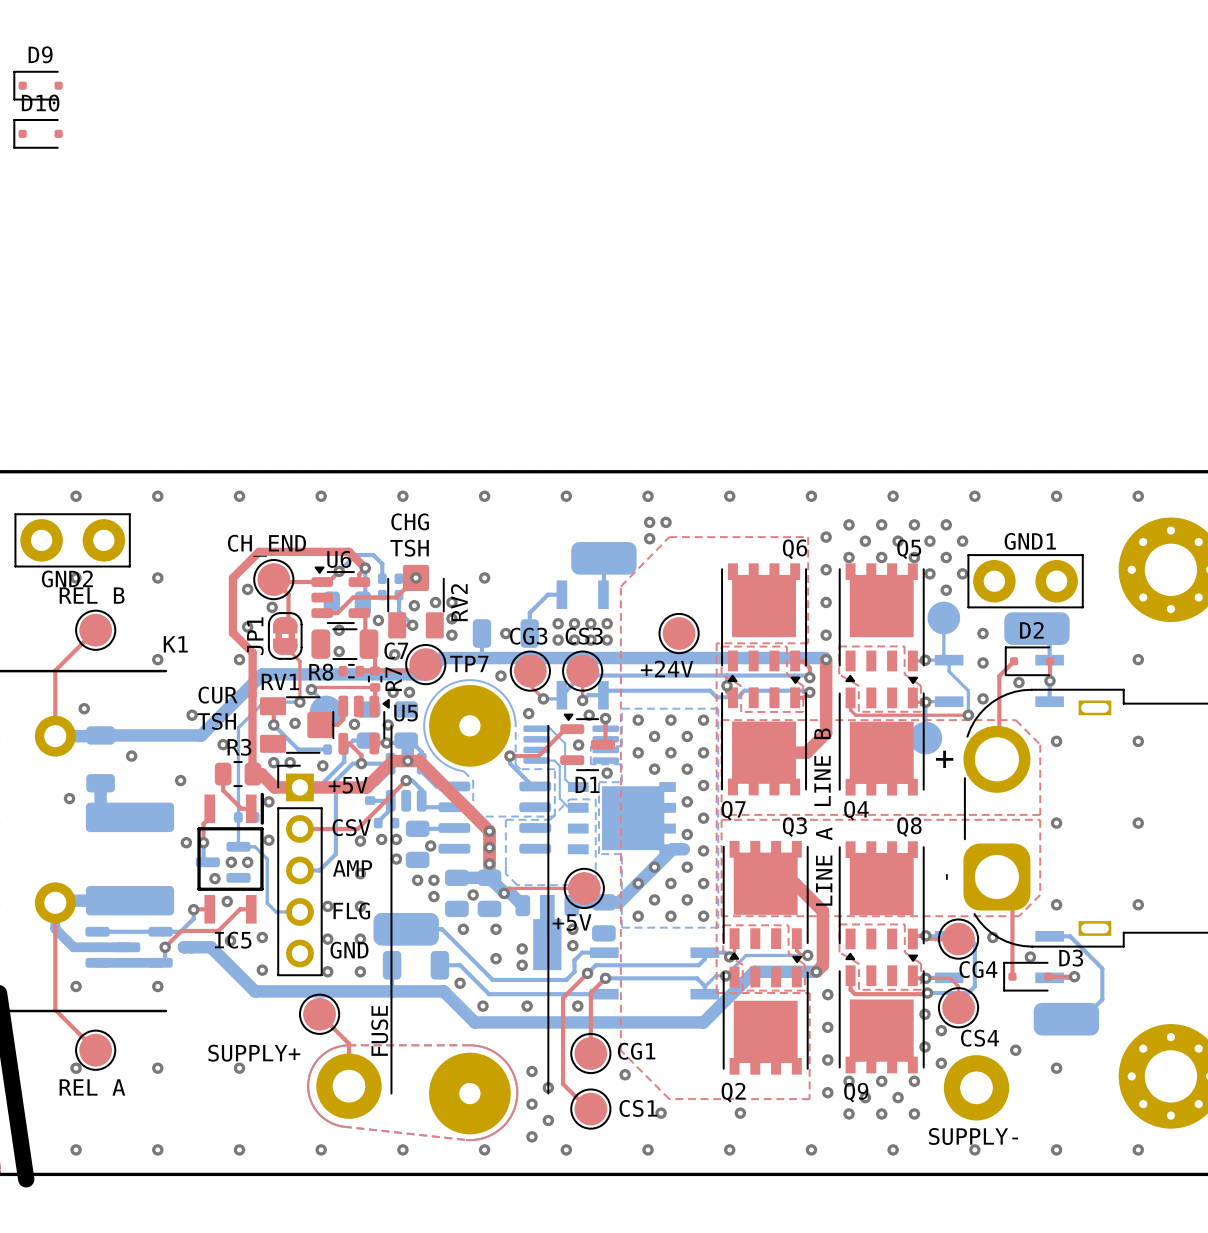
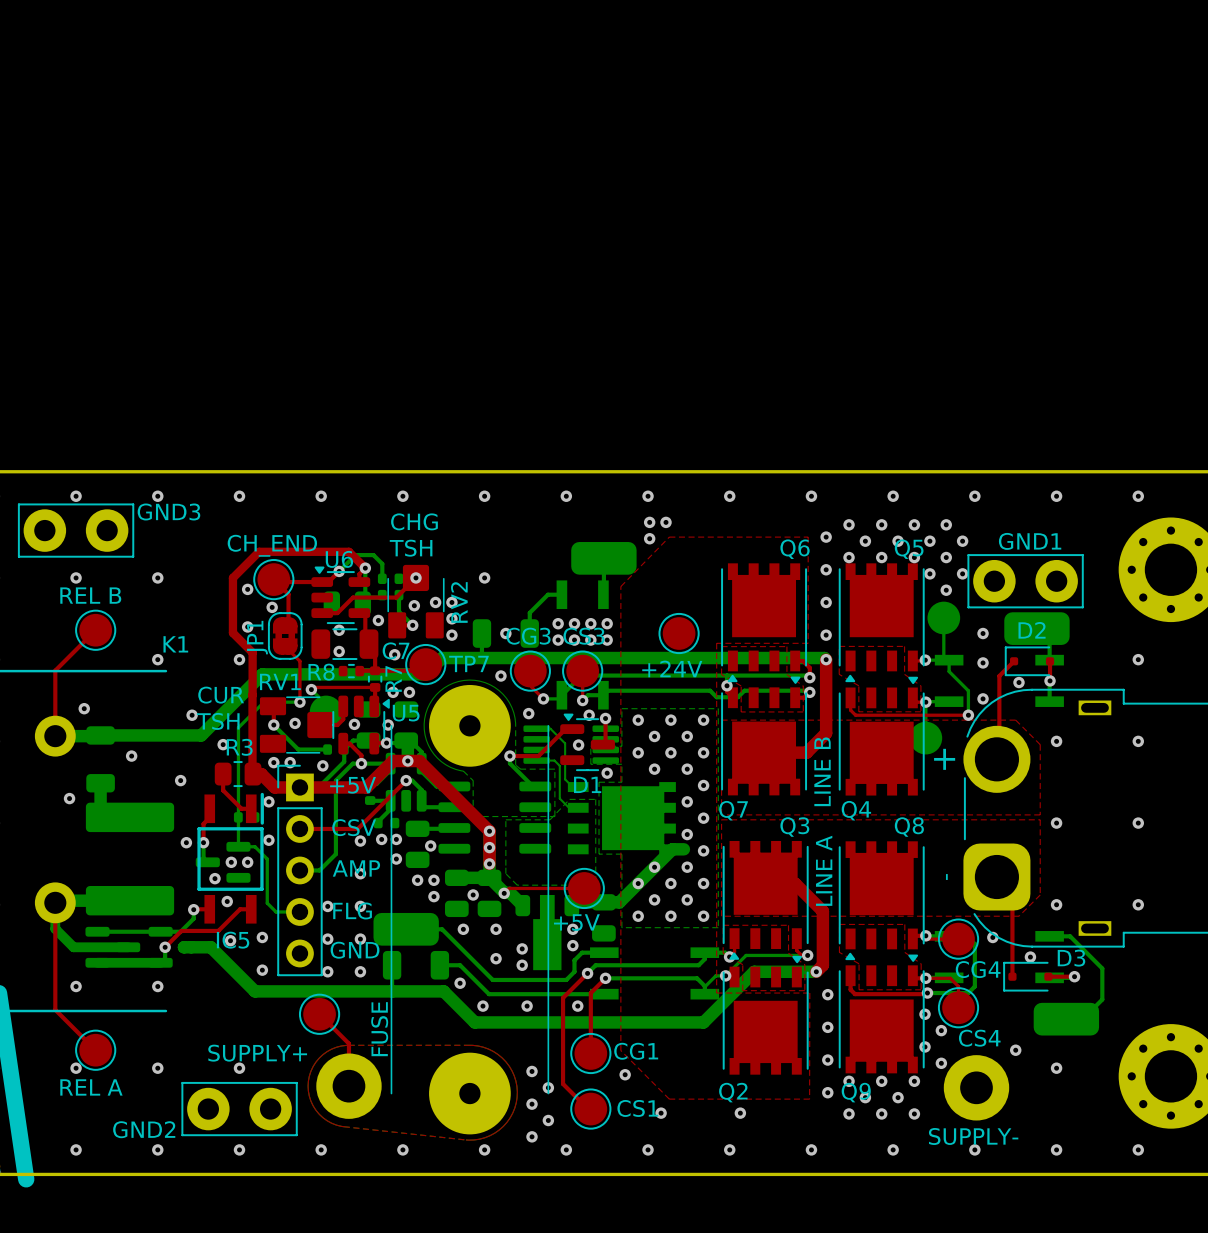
D9: (38, 85) -> none
D10: (38, 133) -> none
GND3: none -> (76, 530)
GND2 position: (72, 540) -> (239, 1109)
GND2 name position: GND2 (67, 578) -> GND2 (144, 1129)

